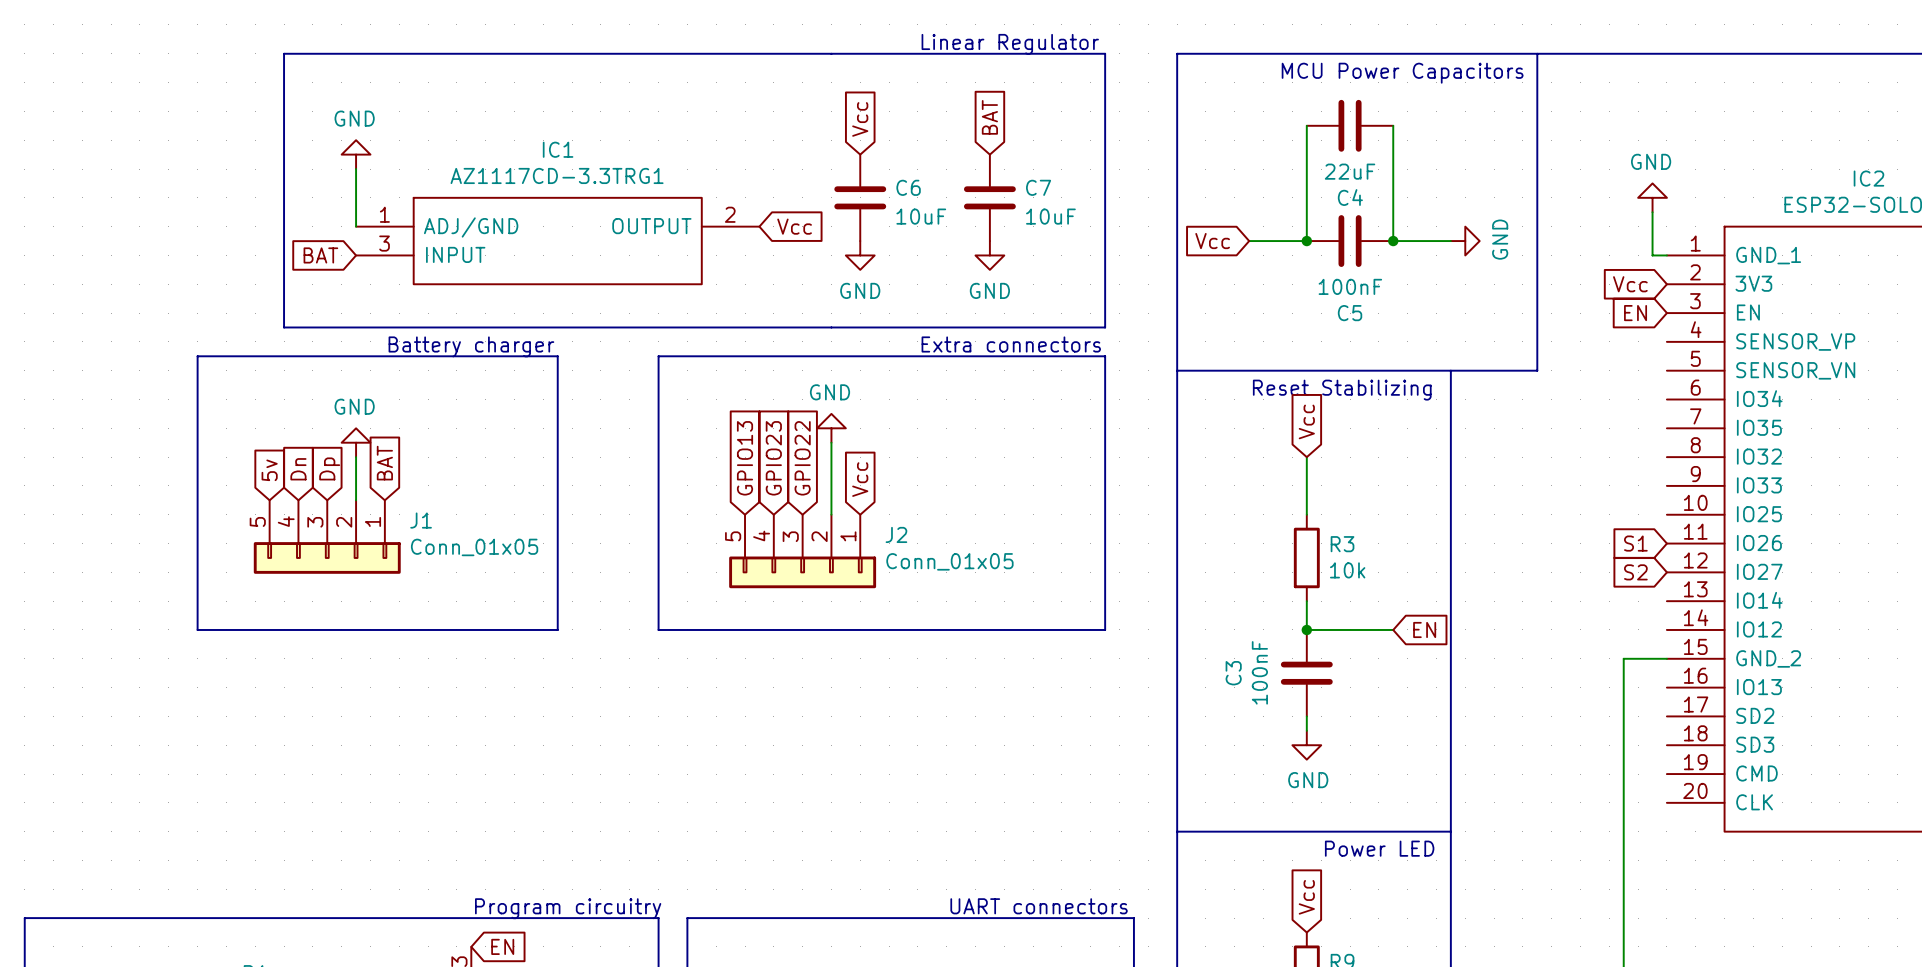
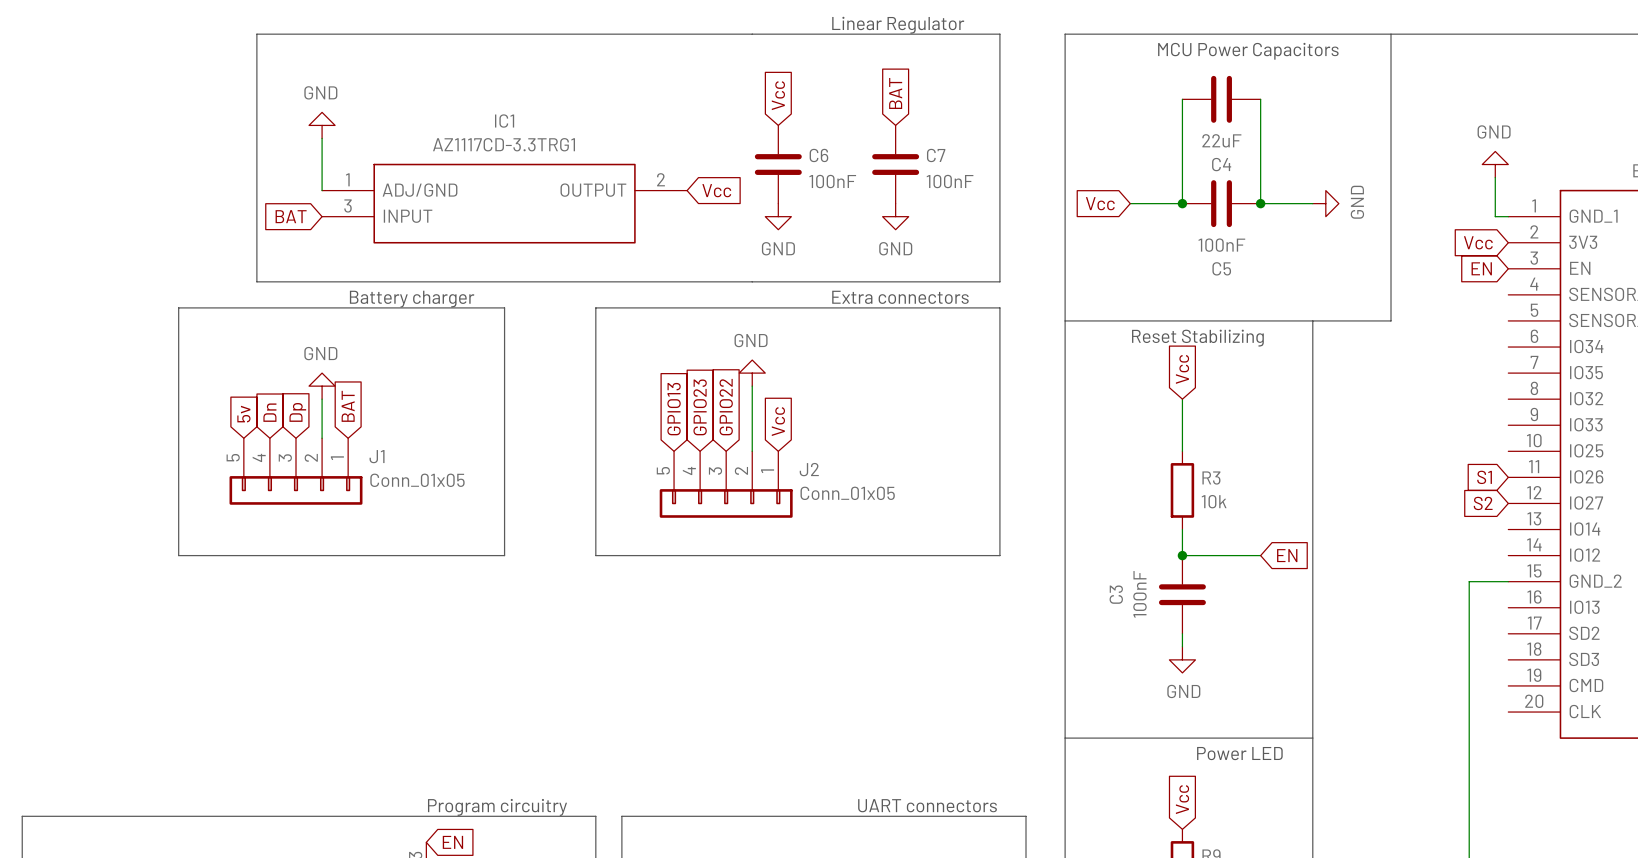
C6 value: 10uF (921, 216) -> 100nF (832, 181)
C7 value: 10uF (1050, 216) -> 100nF (950, 181)

